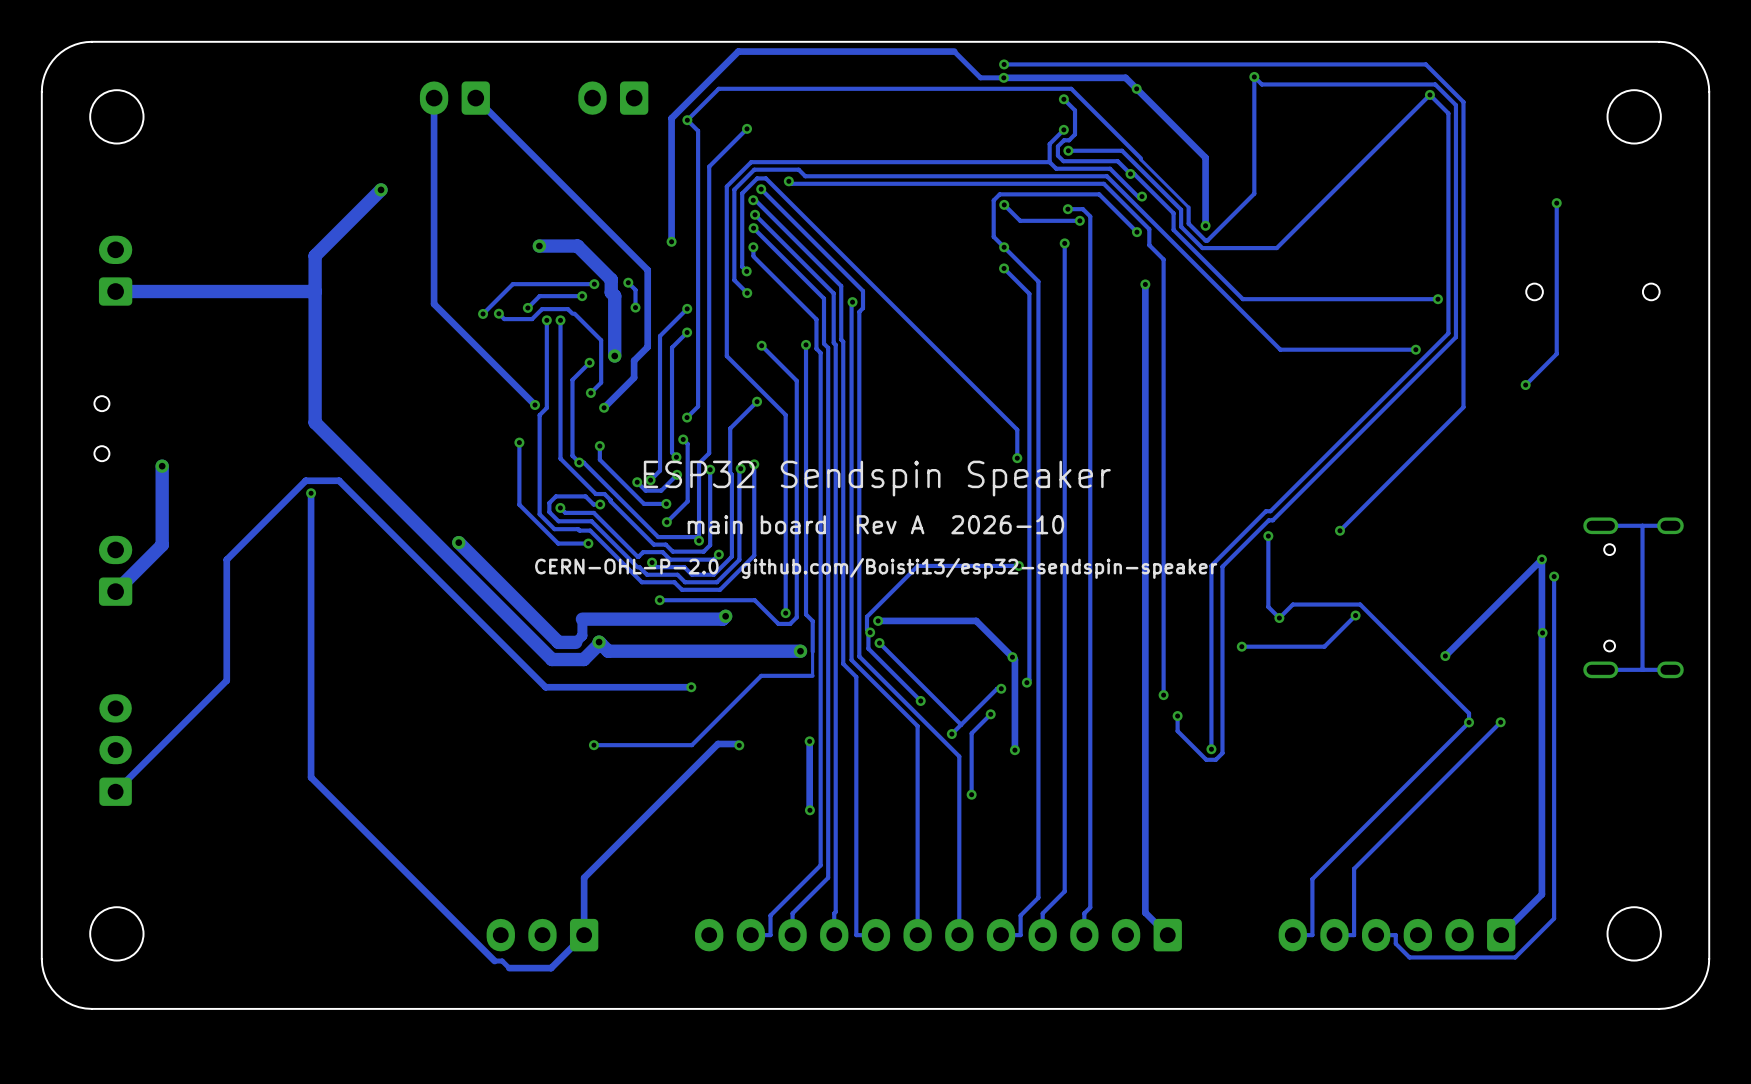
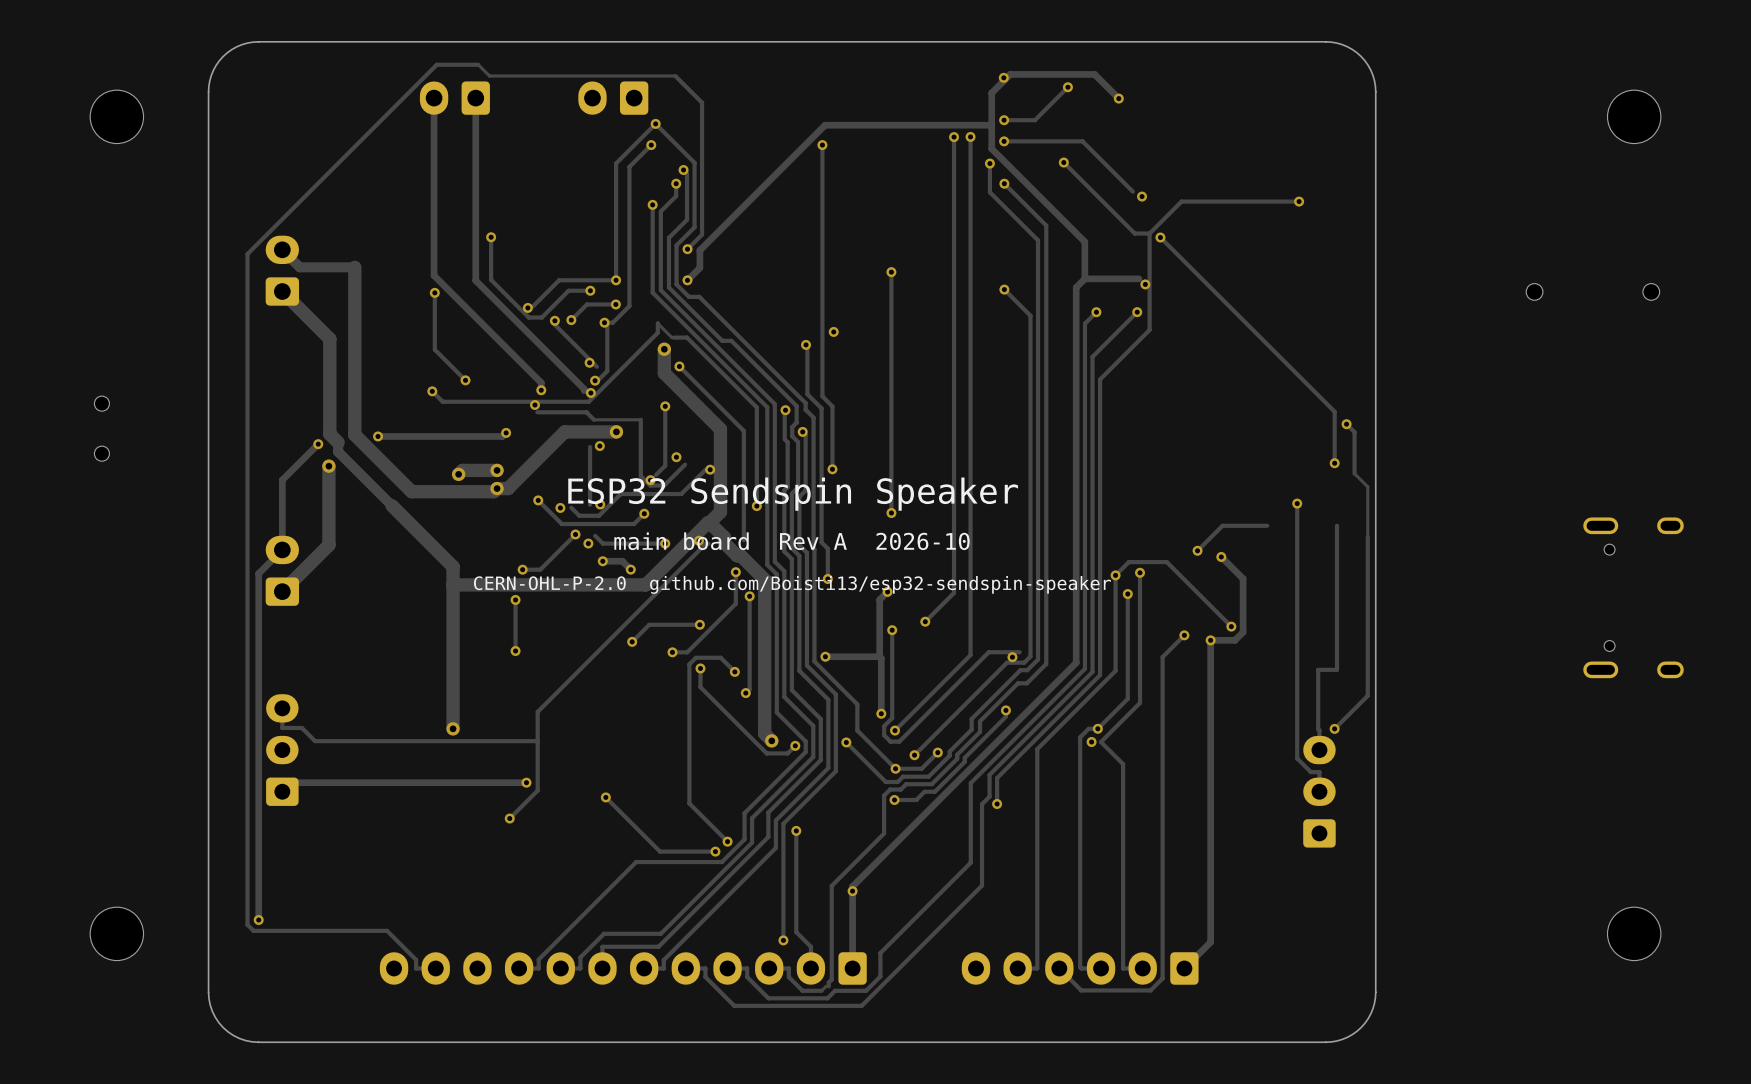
board edge: (1325, 41) (1664, 42) (1680, 46) (1690, 52) (1701, 65) (1706, 75) (1709, 91) (1709, 958) (1706, 975) (1698, 990) (1690, 998) (1675, 1006) (1659, 1008) (91, 1008) (72, 1005) (61, 998) (52, 989) (45, 978) (41, 958) (43, 80) (46, 70) (56, 56) (65, 49) (80, 43) (258, 41) -> (1325, 41) (1347, 46) (1361, 56) (1372, 75) (1375, 91) (1375, 992) (1372, 1008) (1361, 1027) (1347, 1037) (1325, 1042) (258, 1042) (239, 1038) (223, 1027) (212, 1011) (208, 992) (208, 91) (211, 75) (223, 56) (242, 44) (258, 41)
track: (1004, 64) (1425, 64) (1463, 102) (1463, 407) (1339, 530) -> none
via: (1004, 64) -> none
via: (1254, 76) -> none
track: none -> (1067, 87) (1034, 120) (1004, 120)
via position: (1136, 88) -> (1118, 98)
via: (1429, 94) -> none
track: (475, 98) (647, 270) (647, 347) (634, 360) (634, 377) (604, 407) -> (475, 98) (475, 280) (584, 390)
track: none -> (1118, 98) (1094, 74) (1010, 74) (991, 92) (991, 148) (1084, 241) (1084, 278)
track: (1063, 99) (1075, 110) (1075, 134) (1057, 146) (1057, 155) (1063, 161) (1117, 161) (1130, 173) (1134, 173) (1173, 213) (1173, 229) (1242, 299) (1437, 299) -> none
via position: (1063, 99) -> (1067, 87)
via: (687, 120) -> none
via: none -> (1004, 120)
via: none -> (655, 123)
track: none -> (991, 125) (825, 125) (699, 250) (699, 267) (687, 280)
track: (747, 128) (709, 166) (709, 453) (699, 463) (699, 540) (695, 537) (658, 537) (583, 462) (579, 462) (572, 455) (572, 379) (589, 362) -> none
via: (747, 128) -> none
track: (1063, 129) (1049, 144) (1049, 162) -> none
via: (1063, 129) -> none
track: none -> (970, 136) (970, 655) (895, 730)
via: none -> (970, 136)
track: none -> (954, 137) (954, 592) (925, 621)
via: none -> (954, 137)
track: none -> (1004, 141) (1082, 141) (1132, 191)
via: none -> (1004, 141)
track: none -> (651, 145) (629, 166) (629, 306) (612, 322) (604, 322) (607, 325) (607, 371) (597, 380) (595, 380)
via: none -> (651, 145)
track: none -> (822, 145) (822, 396) (832, 406) (832, 469)
via: none -> (822, 145)
track: (1068, 150) (1122, 150) (1181, 209) (1181, 226) (1202, 248) (1276, 248) (1429, 94) (1448, 113) (1448, 333) (1270, 511) (1265, 511) (1211, 565) (1211, 749) -> none
via position: (1068, 150) -> (1063, 162)
track: (1049, 162) (751, 162) (726, 186) (726, 356) -> (676, 183) (676, 196) (660, 211) (660, 290) (726, 356)
track: (1049, 162) (1056, 168) (1110, 168) (1139, 197) (1142, 196) -> none
track: none -> (1063, 162) (1134, 233) (1149, 233)
track: none -> (989, 163) (989, 192) (1038, 240) (1038, 659) (1027, 670) (1020, 670) (971, 718) (971, 729) (928, 776) (903, 776) (897, 782) (885, 782) (846, 742)
via: none -> (989, 163)
track: none -> (683, 170) (687, 173) (687, 219) (668, 237) (668, 287) (722, 340) (731, 340) (796, 406) (796, 422) (792, 427) (792, 436) (798, 442) (798, 487) (791, 493) (791, 548) (799, 555) (799, 670) (828, 699) (828, 768) (775, 820) (775, 847) (663, 960) (663, 968) (644, 968)
via: none -> (683, 170)
via: (1130, 173) -> none
track: (788, 181) (791, 183) (1103, 183) (1149, 229) (1149, 245) (1163, 259) (1163, 695) -> none
via: (788, 181) -> none
via: none -> (676, 183)
track: none -> (1004, 183) (1046, 225) (1046, 663) (1026, 683) (1018, 683) (980, 721) (980, 731) (931, 784) (906, 784) (900, 789) (890, 789) (884, 795) (884, 833) (831, 885) (831, 979) (828, 982) (828, 986) (821, 990) (802, 990) (788, 977) (788, 968) (769, 968)
track: (381, 189) (315, 255) (315, 422) (551, 659) (583, 659) (600, 643) -> none
via: (381, 189) -> none
track: (761, 189) (863, 291) (863, 308) (859, 311) (859, 656) (959, 756) (959, 935) -> none
via: (761, 189) -> none
track: (753, 200) (841, 286) (841, 339) (843, 341) (843, 663) (856, 676) (856, 935) (875, 935) -> none
via: (753, 200) -> none
track: none -> (1299, 201) (1181, 201) (1149, 233)
via: none -> (1299, 201)
track: (1556, 203) (1556, 353) (1525, 385) -> none
via: (1556, 203) -> none
track: none -> (652, 204) (652, 292) (767, 407) (767, 564) (776, 574) (776, 712) (805, 741) (805, 752) (744, 813) (744, 839) (721, 862) (636, 862) (538, 959) (538, 968) (519, 968)
via: none -> (652, 204)
track: (1004, 204) (1020, 220) (1079, 220) -> none
via position: (1004, 204) -> (1004, 183)
track: (1067, 209) (1082, 209) (1090, 216) (1090, 907) (1084, 913) (1084, 935) -> none
via: (1067, 209) -> none
track: (755, 214) (833, 293) (833, 342) (835, 344) (834, 935) -> none
via: (755, 214) -> none
via: (1079, 220) -> none
track: (1205, 225) (1205, 157) (1125, 77) (980, 77) (954, 51) (738, 51) (671, 118) (671, 241) -> none
via: (1205, 225) -> none
track: (753, 228) (824, 298) (824, 343) (828, 347) (828, 877) (792, 913) (792, 935) -> none
via: (753, 228) -> none
track: (1136, 232) (1099, 194) (999, 194) (993, 200) (993, 236) (1038, 281) (1038, 897) (1020, 915) (1020, 935) (1000, 935) -> none
via: (1136, 232) -> none
track: none -> (1149, 233) (1149, 329) (1100, 379) (1100, 675) (997, 778) (997, 804)
track: none -> (491, 237) (491, 279) (528, 317) (541, 317) (568, 290) (590, 290)
via: none -> (491, 237)
track: none -> (1160, 237) (1334, 411) (1334, 463)
via: none -> (1160, 237)
via position: (671, 241) -> (687, 249)
track: (1064, 243) (1064, 891) (1042, 913) (1042, 935) -> none
via: (1064, 243) -> none
track: (539, 246) (577, 246) (611, 279) (611, 292) (614, 296) (614, 356) -> none
via: (539, 246) -> none
track: (753, 247) (753, 256) (816, 319) (816, 348) (820, 352) (820, 865) (770, 915) (770, 935) (750, 935) -> none
via: (753, 247) -> none
via: (1004, 247) -> none
track: none -> (282, 249) (299, 267) (354, 267) (354, 434) (411, 491) (493, 491) (497, 488) (508, 488) (564, 431) (616, 431)
track: none -> (687, 249) (702, 234) (702, 102) (675, 75) (489, 75) (478, 64) (436, 64) (247, 254) (247, 924) (253, 930) (387, 930) (416, 959) (416, 968) (435, 968)
track: (1004, 268) (1029, 293) (1029, 680) (1026, 682) -> none
via: (1004, 268) -> none
part position: (115, 270) -> (282, 270)
track: (746, 271) (742, 266) (742, 193) (757, 178) (765, 178) (1017, 429) (1017, 458) -> none
via: (746, 271) -> none
track: none -> (891, 272) (891, 512)
via: none -> (891, 272)
track: (434, 275) (434, 304) (535, 405) -> (434, 275) (541, 382) (541, 390)
track: none -> (1084, 278) (1076, 287) (1076, 662) (852, 886) (852, 968)
track: none -> (1138, 278) (1084, 278)
via: none -> (616, 280)
via: none -> (687, 280)
track: (628, 282) (635, 289) (635, 307) -> none
via: (628, 282) -> none
track: (594, 284) (512, 284) (483, 313) -> none
via: (594, 284) -> none
track: (1145, 284) (1145, 912) (1167, 935) -> none
track: none -> (1004, 289) (1030, 315) (1030, 656) (1024, 662) (1007, 662) (914, 755)
via: none -> (1004, 289)
via: none -> (590, 290)
track: none -> (282, 291) (329, 338) (329, 434) (338, 442) (338, 451) (453, 566) (453, 728)
track: (315, 291) (115, 291) -> none
track: none -> (434, 292) (434, 349) (465, 380)
via: none -> (434, 292)
track: (747, 293) (734, 280) (734, 189) (754, 169) (798, 169) (805, 176) (1106, 176) (1280, 349) (1415, 349) -> none
via: (747, 293) -> none
track: (582, 296) (539, 296) (527, 307) -> none
via: (582, 296) -> none
via: (1437, 299) -> none
track: (852, 302) (851, 660) (917, 726) (917, 935) -> none
via: (852, 302) -> none
track: none -> (615, 304) (586, 304) (571, 320)
via: none -> (615, 304)
track: none -> (533, 306) (559, 280) (616, 280) (616, 163) (655, 123) (694, 162) (694, 227) (676, 245) (676, 284) (688, 296) (699, 296) (805, 403) (805, 409) (813, 417) (814, 661) (857, 704) (857, 730) (895, 768) (921, 768) (937, 752)
via: (635, 307) -> none
track: (687, 308) (660, 336) (660, 470) -> (665, 406) (665, 465) (660, 470)
via: (687, 308) -> none
track: none -> (1096, 312) (1084, 323) (1084, 668) (970, 783) (970, 862) (880, 953) (880, 976) (866, 990) (835, 990) (827, 998) (768, 998) (747, 977) (747, 968) (727, 968)
via: none -> (1096, 312)
track: none -> (1137, 312) (1092, 356) (1092, 671) (989, 774) (989, 796) (982, 804) (982, 885) (861, 1005) (734, 1005) (705, 977) (705, 968) (685, 968)
via: none -> (1137, 312)
via: (483, 313) -> none
track: (498, 313) (504, 319) (532, 319) (542, 309) (567, 309) (574, 313) (601, 340) (601, 382) (590, 392) -> none
via: (498, 313) -> none
track: (546, 320) (546, 407) (539, 415) (539, 514) (554, 529) (590, 530) (641, 582) (674, 582) (681, 589) (720, 589) (754, 555) (754, 464) -> none
via: (546, 320) -> none
track: none -> (554, 320) (554, 324) (596, 366)
via: none -> (554, 320)
track: (560, 320) (560, 458) (595, 494) (604, 494) (653, 544) (665, 544) (672, 551) (703, 551) (710, 545) (710, 469) -> none
via: (560, 320) -> none
via: none -> (571, 320)
via: none -> (604, 322)
via: none -> (833, 331)
track: (687, 332) (672, 347) (672, 452) (676, 457) -> none
via: (687, 332) -> none
track: (806, 344) (806, 614) (812, 621) (812, 651) -> none
track: (761, 345) (796, 380) (796, 617) (790, 623) (778, 623) (754, 600) (659, 600) -> none
via: (761, 345) -> none
track: none -> (807, 348) (807, 394) (821, 408) (821, 542) (827, 548) (827, 579)
track: none -> (664, 349) (664, 373) (720, 429) (720, 511) (709, 522)
via: none -> (664, 349)
via: (1415, 349) -> none
via: (614, 356) -> none
track: none -> (679, 366) (743, 430) (743, 540)
via: none -> (679, 366)
via: none -> (465, 380)
via: (1525, 385) -> none
via: none -> (541, 390)
track: none -> (432, 391) (442, 401) (588, 401) (657, 332) (657, 323) (671, 337) (686, 337) (756, 407) (756, 506)
via: none -> (432, 391)
track: (757, 401) (730, 428) (731, 556) (713, 574) (691, 574) (684, 567) (656, 567) (652, 562) -> none
via: (757, 401) -> none
track: (774, 404) (785, 414) (785, 613) -> (774, 404) (774, 561) (784, 571) (784, 696) (813, 725) (813, 756) (752, 818) (752, 842) (660, 933) (604, 933) (580, 957) (580, 968) (560, 968)
via: none -> (665, 406)
via position: (604, 407) -> (595, 380)
track: none -> (785, 410) (784, 439) (787, 442) (787, 487) (784, 490) (784, 551) (791, 559) (791, 690) (820, 719) (820, 760) (768, 812) (768, 836) (658, 946) (602, 946) (602, 968)
via: none -> (785, 410)
track: none -> (537, 412) (586, 412) (594, 419) (640, 419) (640, 476) (650, 485) (664, 485) (685, 464)
track: (687, 417) (698, 406) (698, 130) (687, 120) (718, 88) (1071, 88) (1188, 207) (1188, 223) (1207, 240) (1254, 193) (1254, 76) (1261, 84) (1435, 84) (1455, 105) (1455, 337) (1272, 520) (1268, 520) (1222, 566) (1222, 753) (1215, 759) (1206, 759) (1177, 731) (1177, 716) -> none
via: (687, 417) -> none
track: none -> (1346, 424) (1354, 432) (1354, 473) (1367, 486) (1367, 695) (1334, 728)
via: none -> (1346, 424)
via: none -> (616, 431)
track: none -> (802, 431) (805, 434) (805, 490) (799, 496) (799, 545) (806, 552) (806, 665) (835, 694) (835, 771) (783, 823) (783, 940)
via: none -> (802, 431)
track: none -> (506, 432) (502, 436) (378, 436)
via: none -> (378, 436)
track: (683, 439) (687, 443) (687, 501) (666, 522) -> none
via: (683, 439) -> none
track: (519, 442) (519, 504) (558, 543) (588, 543) -> none
via position: (519, 442) -> (506, 432)
track: none -> (318, 444) (282, 480) (282, 549) (258, 573) (258, 920)
via: none -> (318, 444)
track: none -> (590, 446) (590, 504)
track: (599, 446) (599, 459) (643, 503) (666, 503) -> none
via: (1017, 458) -> none
via: (579, 462) -> none
via: none -> (1334, 463)
via: (754, 464) -> none
track: (162, 466) (162, 545) (115, 591) -> (328, 466) (328, 545) (282, 591)
via: (162, 466) -> none
via: none -> (328, 466)
track: (740, 468) (739, 559) (716, 582) (685, 582) (677, 574) (646, 574) (591, 521) (558, 521) (549, 512) (549, 502) (555, 496) (585, 496) (593, 504) (600, 504) -> none
via: (740, 468) -> none
track: none -> (705, 469) (681, 494) (620, 494) (599, 515) (579, 515) (571, 507)
via: none -> (832, 469)
track: none -> (497, 470) (462, 470) (458, 474)
via: none -> (497, 470)
via: none -> (458, 474)
track: (677, 474) (661, 490) (645, 490) (637, 482) -> none
via: (677, 474) -> none
text position: ESP32 Sendspin Speaker (877, 478) -> ESP32 Sendspin Speaker (793, 494)
via: (637, 482) -> none
via: none -> (497, 488)
track: (311, 493) (311, 777) (494, 961) (502, 961) (509, 968) (551, 968) (584, 935) (584, 877) (717, 744) (739, 745) -> none
via: (311, 493) -> none
track: none -> (538, 500) (561, 524) (634, 524) (644, 513)
via: none -> (538, 500)
via: (666, 503) -> none
track: none -> (1297, 503) (1297, 758) (1310, 772) (1319, 772) (1319, 791)
via: none -> (1297, 503)
via: none -> (756, 506)
track: (560, 507) (565, 512) (593, 512) (637, 556) (643, 552) (662, 552) (670, 559) (713, 559) (718, 554) -> none
via: none -> (644, 513)
via: none -> (891, 513)
via: (666, 522) -> none
track: none -> (709, 522) (724, 537) (724, 543) (737, 555) (740, 555) (764, 579) (764, 733) (771, 740)
track: none -> (709, 522) (645, 584) (453, 584)
text position: main board Rev A 2026-10 (875, 524) -> main board Rev A 2026-10 (792, 541)
track: none -> (1267, 525) (1222, 525) (1197, 550)
track: none -> (1336, 525) (1336, 669) (1318, 669) (1319, 750)
track: (1642, 525) (1642, 669) -> none
track: (1670, 525) (1600, 525) -> none
via: (1339, 530) -> none
track: none -> (575, 534) (540, 569) (522, 569)
via: none -> (575, 534)
track: none -> (595, 535) (602, 543) (665, 543)
track: (1268, 536) (1268, 606) (1279, 618) (1292, 604) (1360, 604) (1469, 713) (1469, 722) (1312, 879) (1312, 935) (1292, 935) -> none
via: (1268, 536) -> none
track: (458, 542) (558, 642) (575, 642) (582, 635) (582, 619) (722, 619) (725, 616) -> none
via: (458, 542) -> none
via: none -> (665, 543)
track: none -> (708, 543) (705, 543) (537, 711) (537, 790) (509, 818)
via: none -> (1197, 550)
via position: (718, 554) -> (735, 572)
track: none -> (1221, 556) (1243, 578) (1243, 632) (1234, 640) (1210, 640) (1210, 942) (1184, 968)
via: none -> (1221, 556)
via: (1541, 559) -> none
track: none -> (602, 561) (622, 561) (630, 569)
via: none -> (602, 561)
via: (652, 562) -> none
track: (1018, 565) (917, 565) (866, 616) (866, 629) (870, 632) (868, 634) (868, 648) (920, 700) -> none
via: (1018, 565) -> none
text position: CERN-OHL-P-2.0 github.com/Boisti13/esp32-sendspin-speaker (876, 568) -> CERN-OHL-P-2.0 github.com/Boisti13/esp32-sendspin-speaker (792, 584)
via: none -> (522, 569)
via: none -> (630, 569)
part position: (115, 570) -> (282, 570)
track: none -> (735, 572) (735, 603) (687, 652) (672, 652)
track: none -> (1140, 572) (1140, 702) (1100, 742) (1123, 764) (1123, 968) (1142, 968)
via: none -> (1140, 572)
via: none -> (1115, 575)
track: (1554, 576) (1554, 918) (1515, 957) (1409, 957) (1395, 943) (1395, 935) (1376, 935) -> none
via: (1554, 576) -> none
via: none -> (827, 579)
track: none -> (887, 591) (879, 599) (879, 656)
via: none -> (887, 591)
track: none -> (1127, 594) (1127, 698) (1097, 728) (1088, 728) (1080, 737) (1080, 967) (1101, 968)
via: none -> (1127, 594)
track: none -> (749, 596) (749, 689) (745, 693)
via: none -> (749, 596)
track: none -> (515, 599) (515, 651)
via: none -> (515, 599)
via: (659, 600) -> none
via: (785, 613) -> none
track: (1355, 615) (1324, 646) (1241, 646) -> none
via: (1355, 615) -> none
via: (725, 616) -> none
via: (1279, 618) -> none
track: (878, 620) (976, 620) (1014, 659) (1014, 750) -> none
via: (878, 620) -> none
via: none -> (925, 621)
track: none -> (699, 624) (649, 624) (632, 641)
via: none -> (699, 624)
track: none -> (1231, 626) (1166, 562) (1128, 562) (1115, 575) (1115, 670) (1037, 749) (1037, 968) (1017, 968)
via: none -> (1231, 626)
track: none -> (892, 630) (892, 718) (884, 726) (884, 735) (890, 741) (899, 741) (988, 652) (1019, 652)
via: none -> (892, 630)
via: (870, 632) -> none
via: (1542, 632) -> none
track: none -> (1184, 635) (1162, 657) (1162, 978) (1150, 990) (1081, 990) (1059, 968)
via: none -> (1184, 635)
via: none -> (1210, 640)
via: none -> (632, 641)
track: (599, 642) (608, 651) (800, 651) -> none
via: (599, 642) -> none
track: (879, 643) (961, 724) -> none
via: (879, 643) -> none
via: (1241, 646) -> none
via: none -> (515, 651)
via: (800, 651) -> none
track: (812, 651) (812, 675) (761, 675) (691, 745) (593, 745) -> none
via: none -> (672, 652)
via: none -> (825, 656)
track: none -> (879, 656) (881, 658) (881, 713)
track: none -> (879, 656) (825, 656)
track: (1445, 656) (1541, 559) (1541, 894) (1501, 935) -> none
via: (1445, 656) -> none
track: none -> (700, 668) (700, 687) (766, 753) (787, 753) (795, 745)
via: none -> (700, 668)
track: (1670, 669) (1600, 669) -> none
track: none -> (734, 671) (720, 657) (695, 657) (689, 664) (689, 803) (727, 841)
via: none -> (734, 671)
via: (1026, 682) -> none
track: (691, 687) (545, 687) (339, 480) (305, 480) (226, 559) (226, 680) (115, 791) -> none
via: (691, 687) -> none
track: (1001, 688) (997, 688) (951, 734) -> none
via: (1001, 688) -> none
via: none -> (745, 693)
via: (1163, 695) -> none
via: (920, 700) -> none
track: none -> (282, 708) (282, 727) (301, 727) (315, 741) (537, 741)
track: none -> (1005, 710) (1005, 716) (964, 757) (964, 761) (934, 791) (924, 791) (916, 800) (894, 800)
via: none -> (1005, 710)
via: none -> (881, 713)
track: (990, 714) (971, 733) (971, 794) -> none
via: (990, 714) -> none
via: (1177, 716) -> none
via: (1469, 722) -> none
track: (1500, 722) (1354, 868) (1354, 935) (1334, 935) -> none
via: (1500, 722) -> none
via: none -> (453, 728)
via: none -> (1097, 728)
via: none -> (1334, 728)
via: none -> (895, 730)
via: (951, 734) -> none
via: none -> (771, 740)
track: (809, 741) (809, 810) -> none
via position: (809, 741) -> (795, 745)
via: none -> (846, 742)
via: none -> (1091, 742)
via: (593, 745) -> none
via: (739, 745) -> none
via: (1211, 749) -> none
part: (115, 750) -> none
part: none -> (282, 750)
via: (1014, 750) -> none
via: none -> (937, 752)
via: none -> (914, 755)
via: none -> (895, 768)
track: none -> (526, 782) (291, 782) (282, 791)
via: none -> (526, 782)
part: none -> (1319, 791)
via: (971, 794) -> none
track: none -> (605, 797) (660, 851) (715, 851)
via: none -> (605, 797)
via: none -> (894, 800)
via: none -> (997, 804)
via position: (809, 810) -> (796, 830)
via: none -> (509, 818)
track: none -> (796, 830) (796, 932) (810, 946) (810, 968)
via: none -> (727, 841)
via: none -> (715, 851)
via: none -> (852, 891)
via: none -> (258, 920)
part: (542, 935) -> none
part position: (938, 935) -> (623, 968)
part position: (1397, 935) -> (1080, 968)
via: none -> (783, 940)

